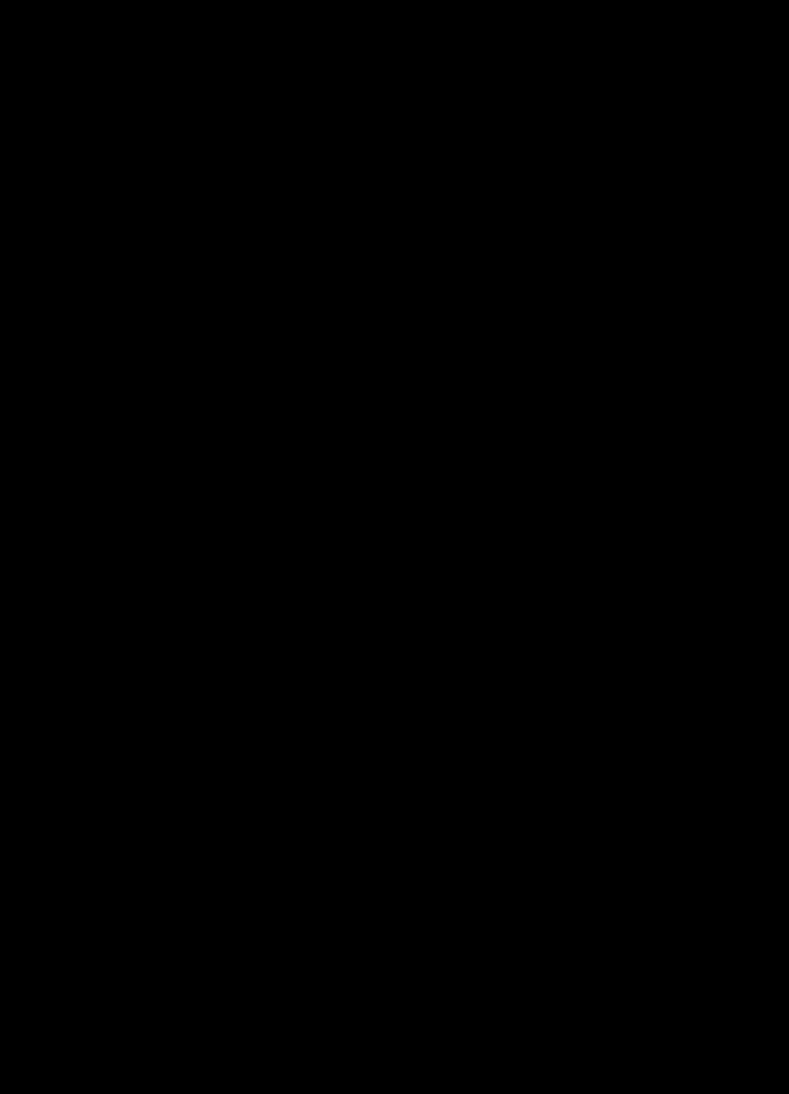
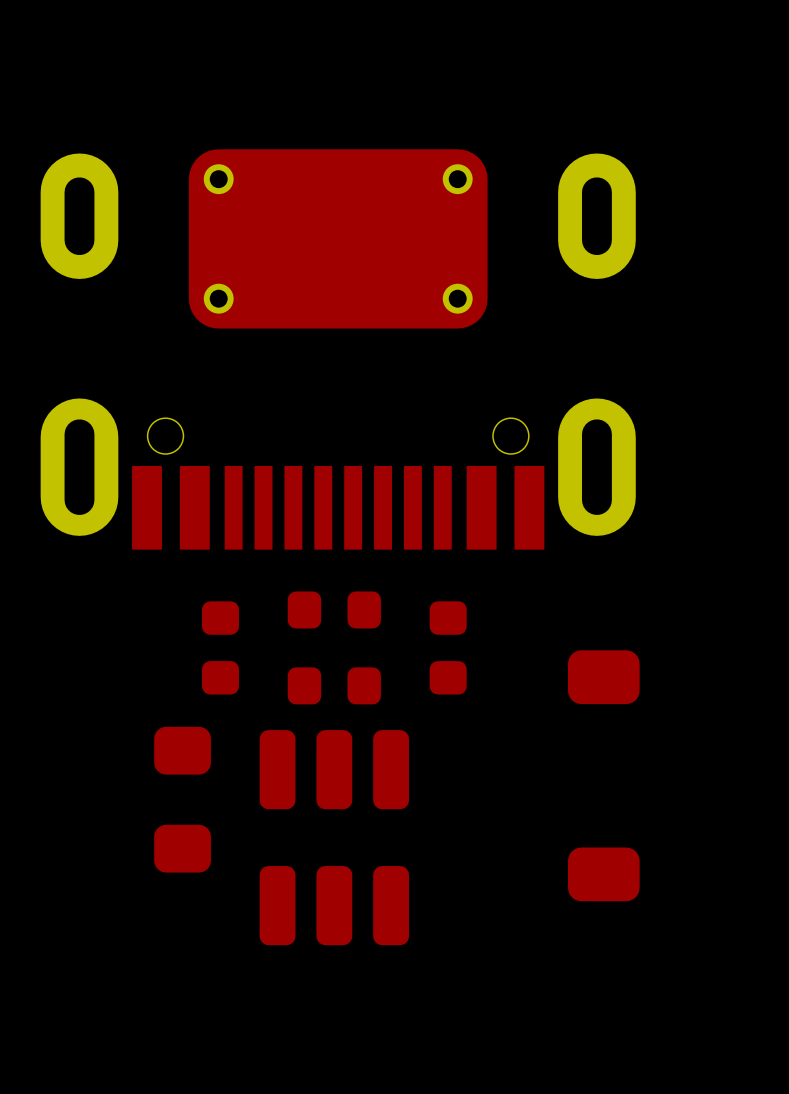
part: none -> (338, 349)
part: none -> (334, 609)
part: none -> (220, 647)
part: none -> (448, 647)
part: none -> (334, 685)
part: none -> (603, 775)
part: none -> (182, 799)
part: none -> (334, 837)

